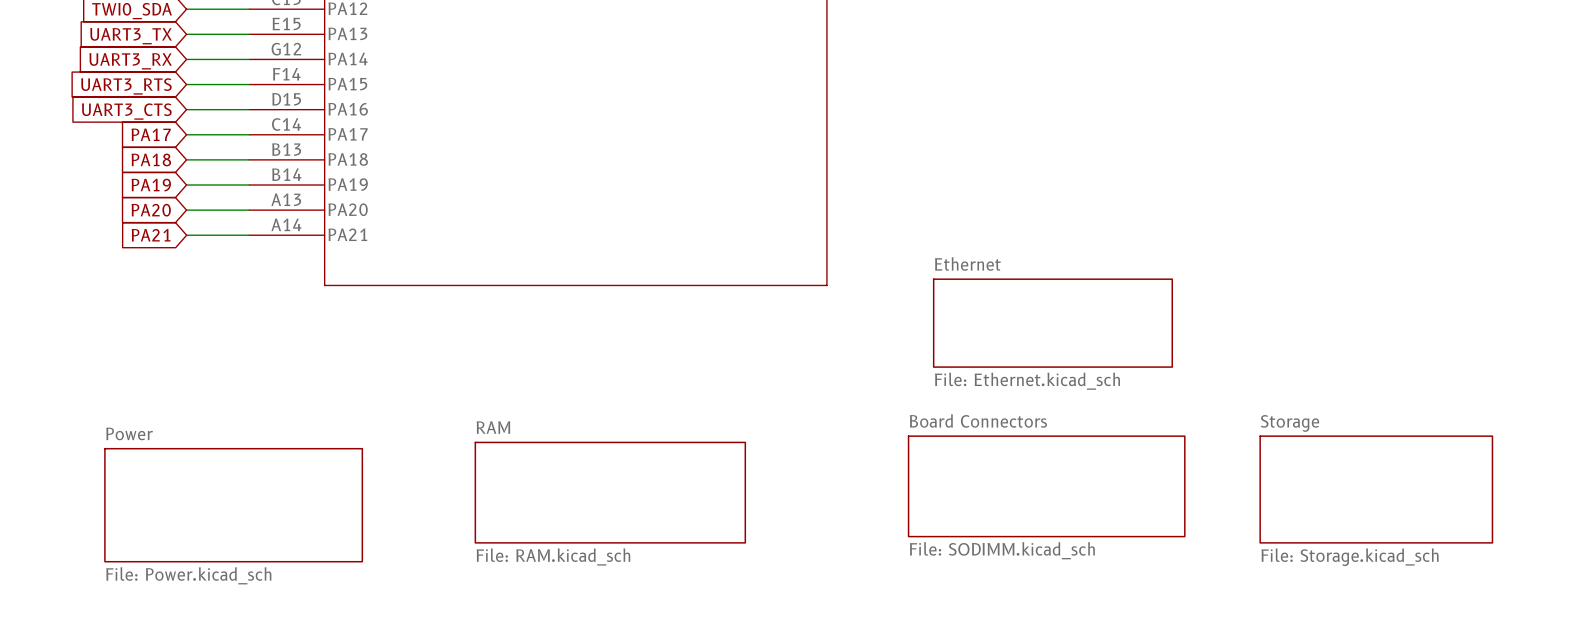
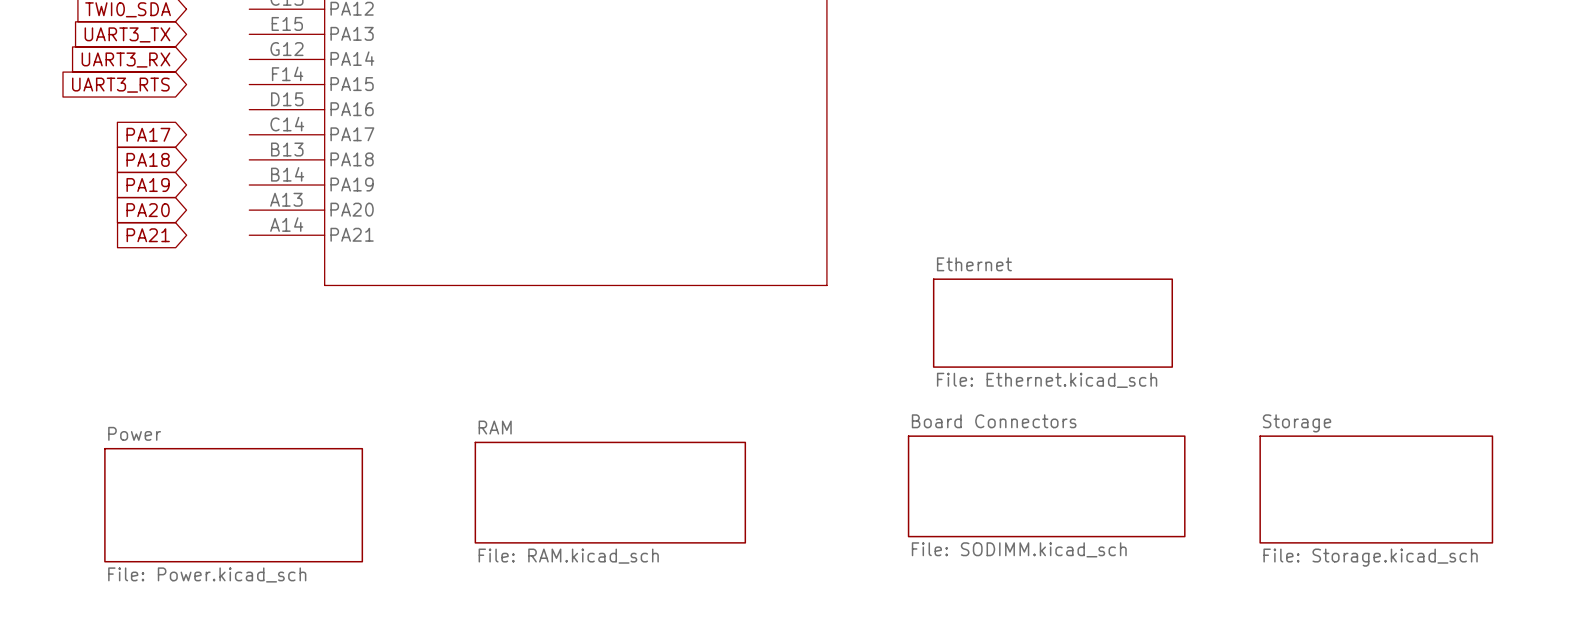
wire: (186, 9) (249, 9) -> none
wire: (186, 34) (249, 34) -> none
wire: (186, 59) (249, 59) -> none
wire: (186, 84) (249, 84) -> none
wire: (186, 109) (249, 109) -> none
global label: UART3_CTS (126, 111) -> none
wire: (186, 134) (249, 134) -> none
wire: (186, 159) (249, 159) -> none
wire: (186, 185) (249, 185) -> none
wire: (186, 210) (249, 210) -> none
wire: (186, 235) (249, 235) -> none

